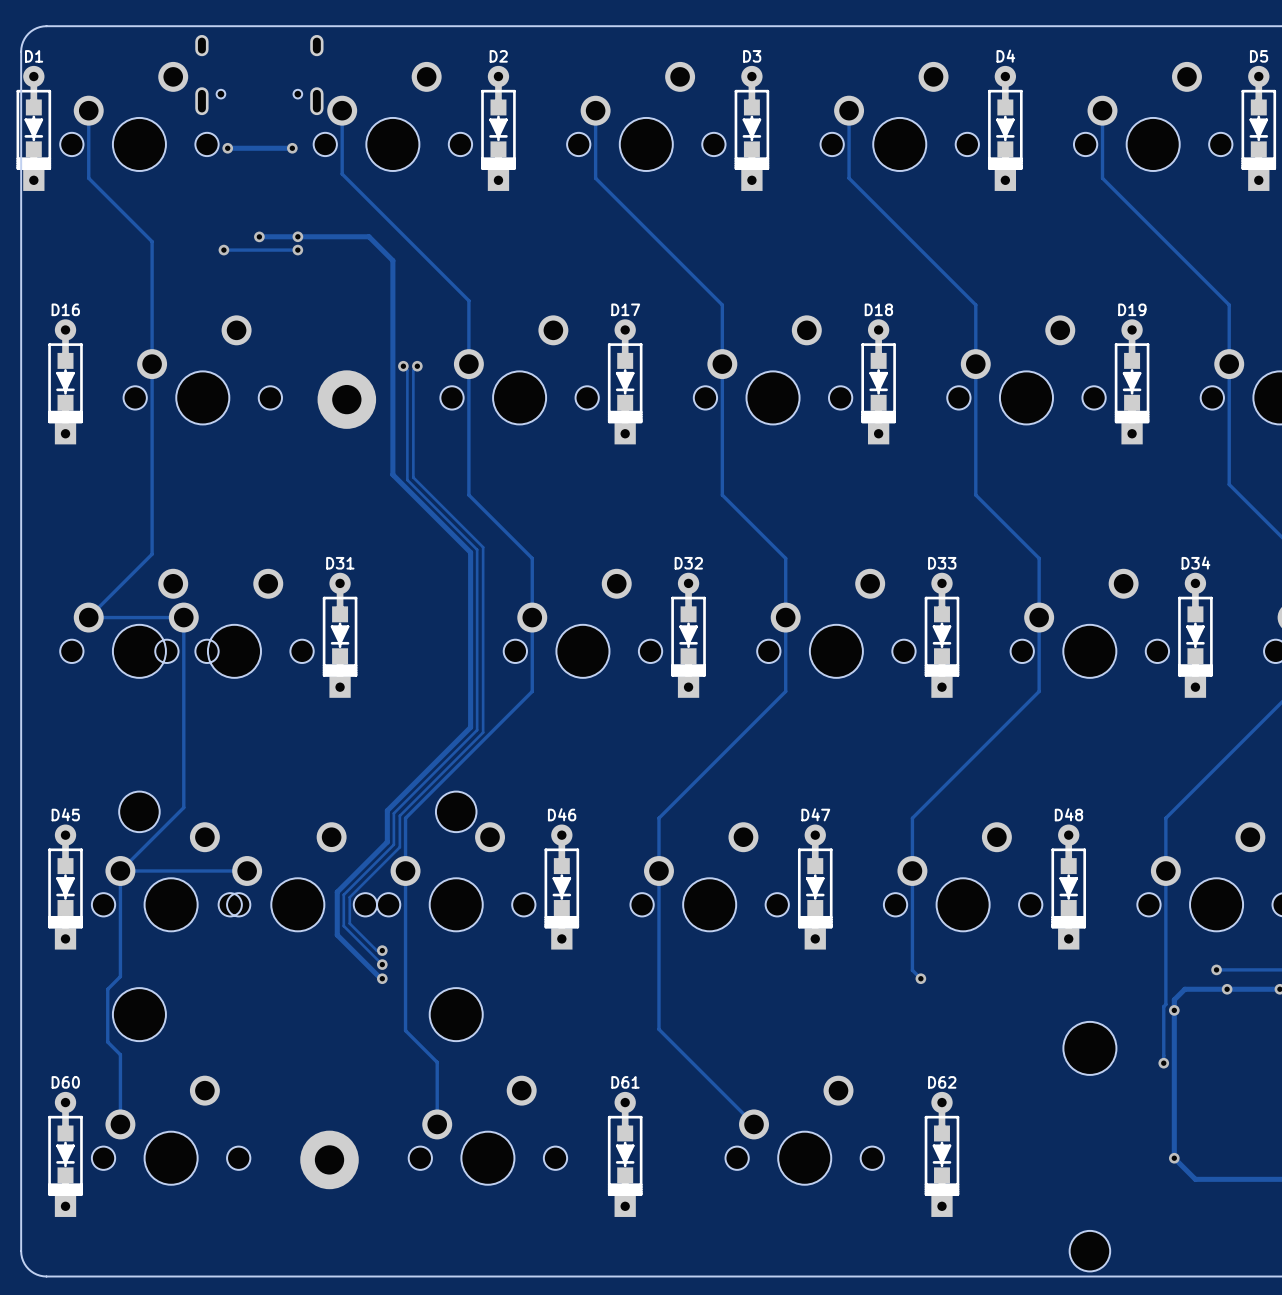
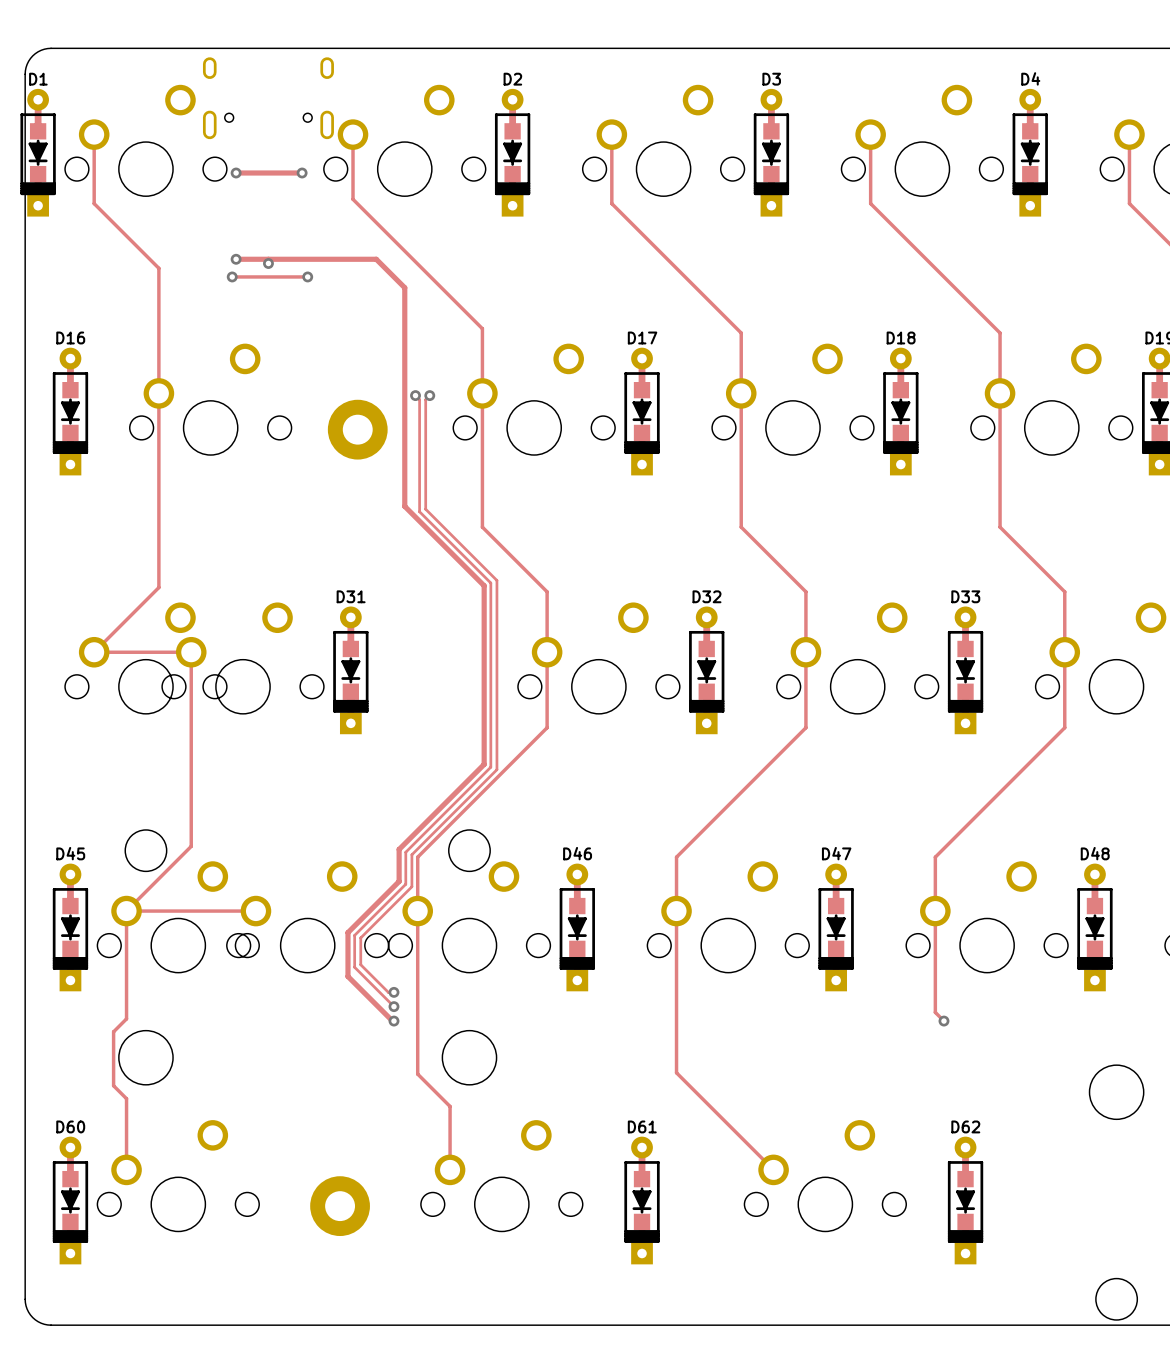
track: (259, 236) (369, 236) -> (236, 259) (376, 259) (380, 263)
via position: (297, 236) -> (236, 259)

